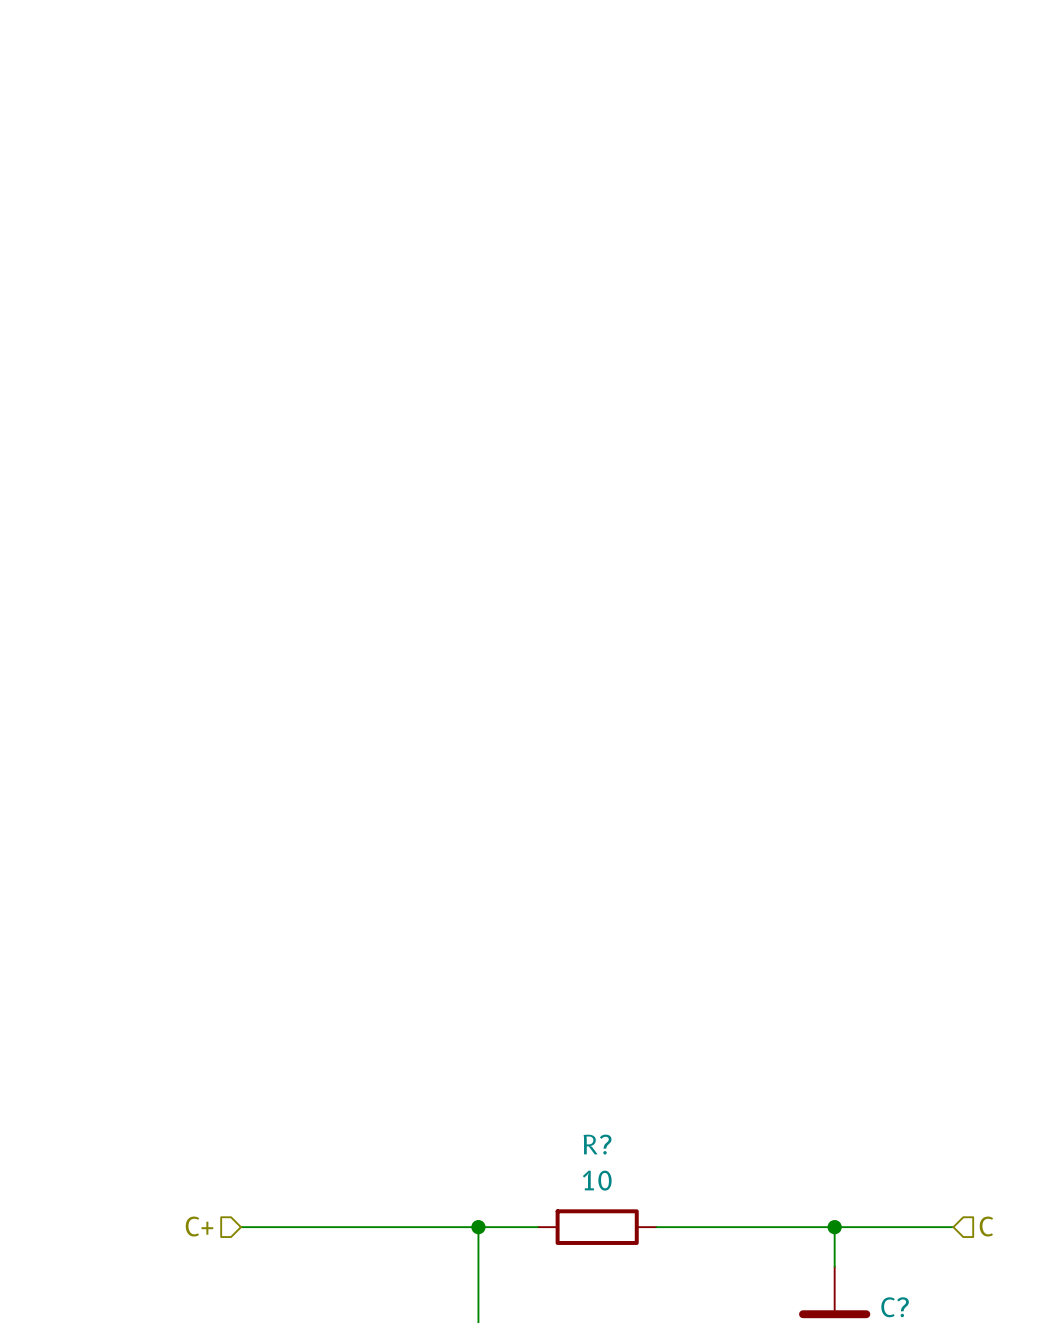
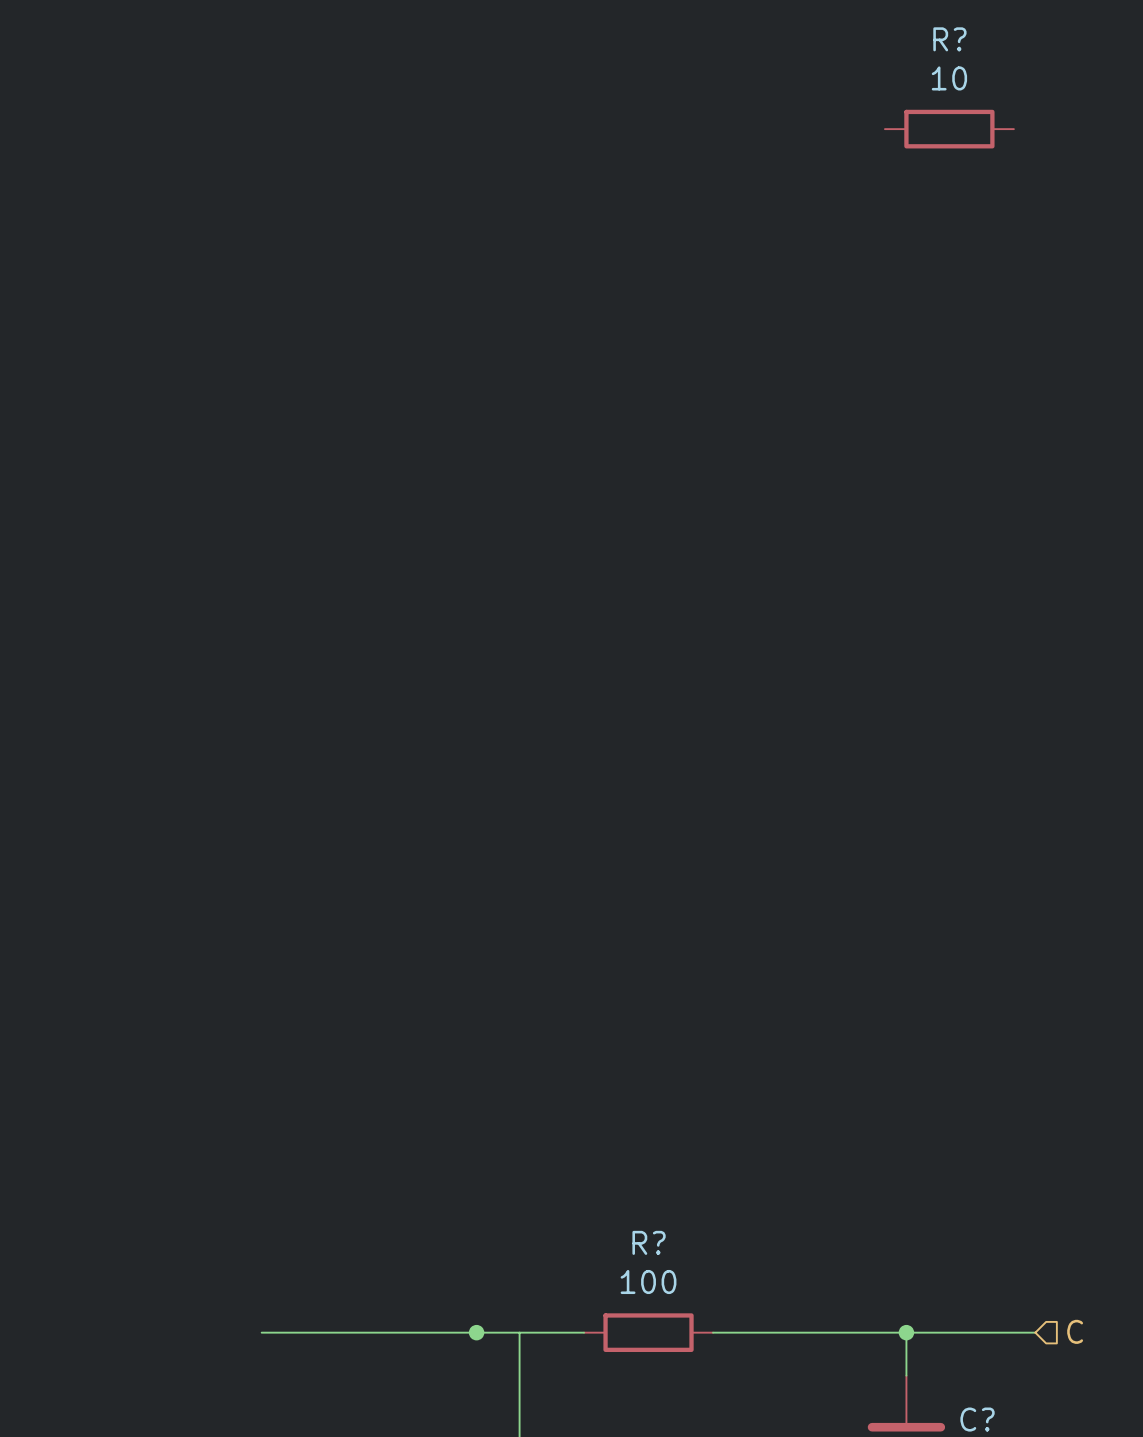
R?: none -> 10 (949, 129)
R? value: 10 (597, 1180) -> 100 (648, 1281)
hierarchical label: C+ (199, 1226) -> none
junction position: (478, 1227) -> (476, 1332)

